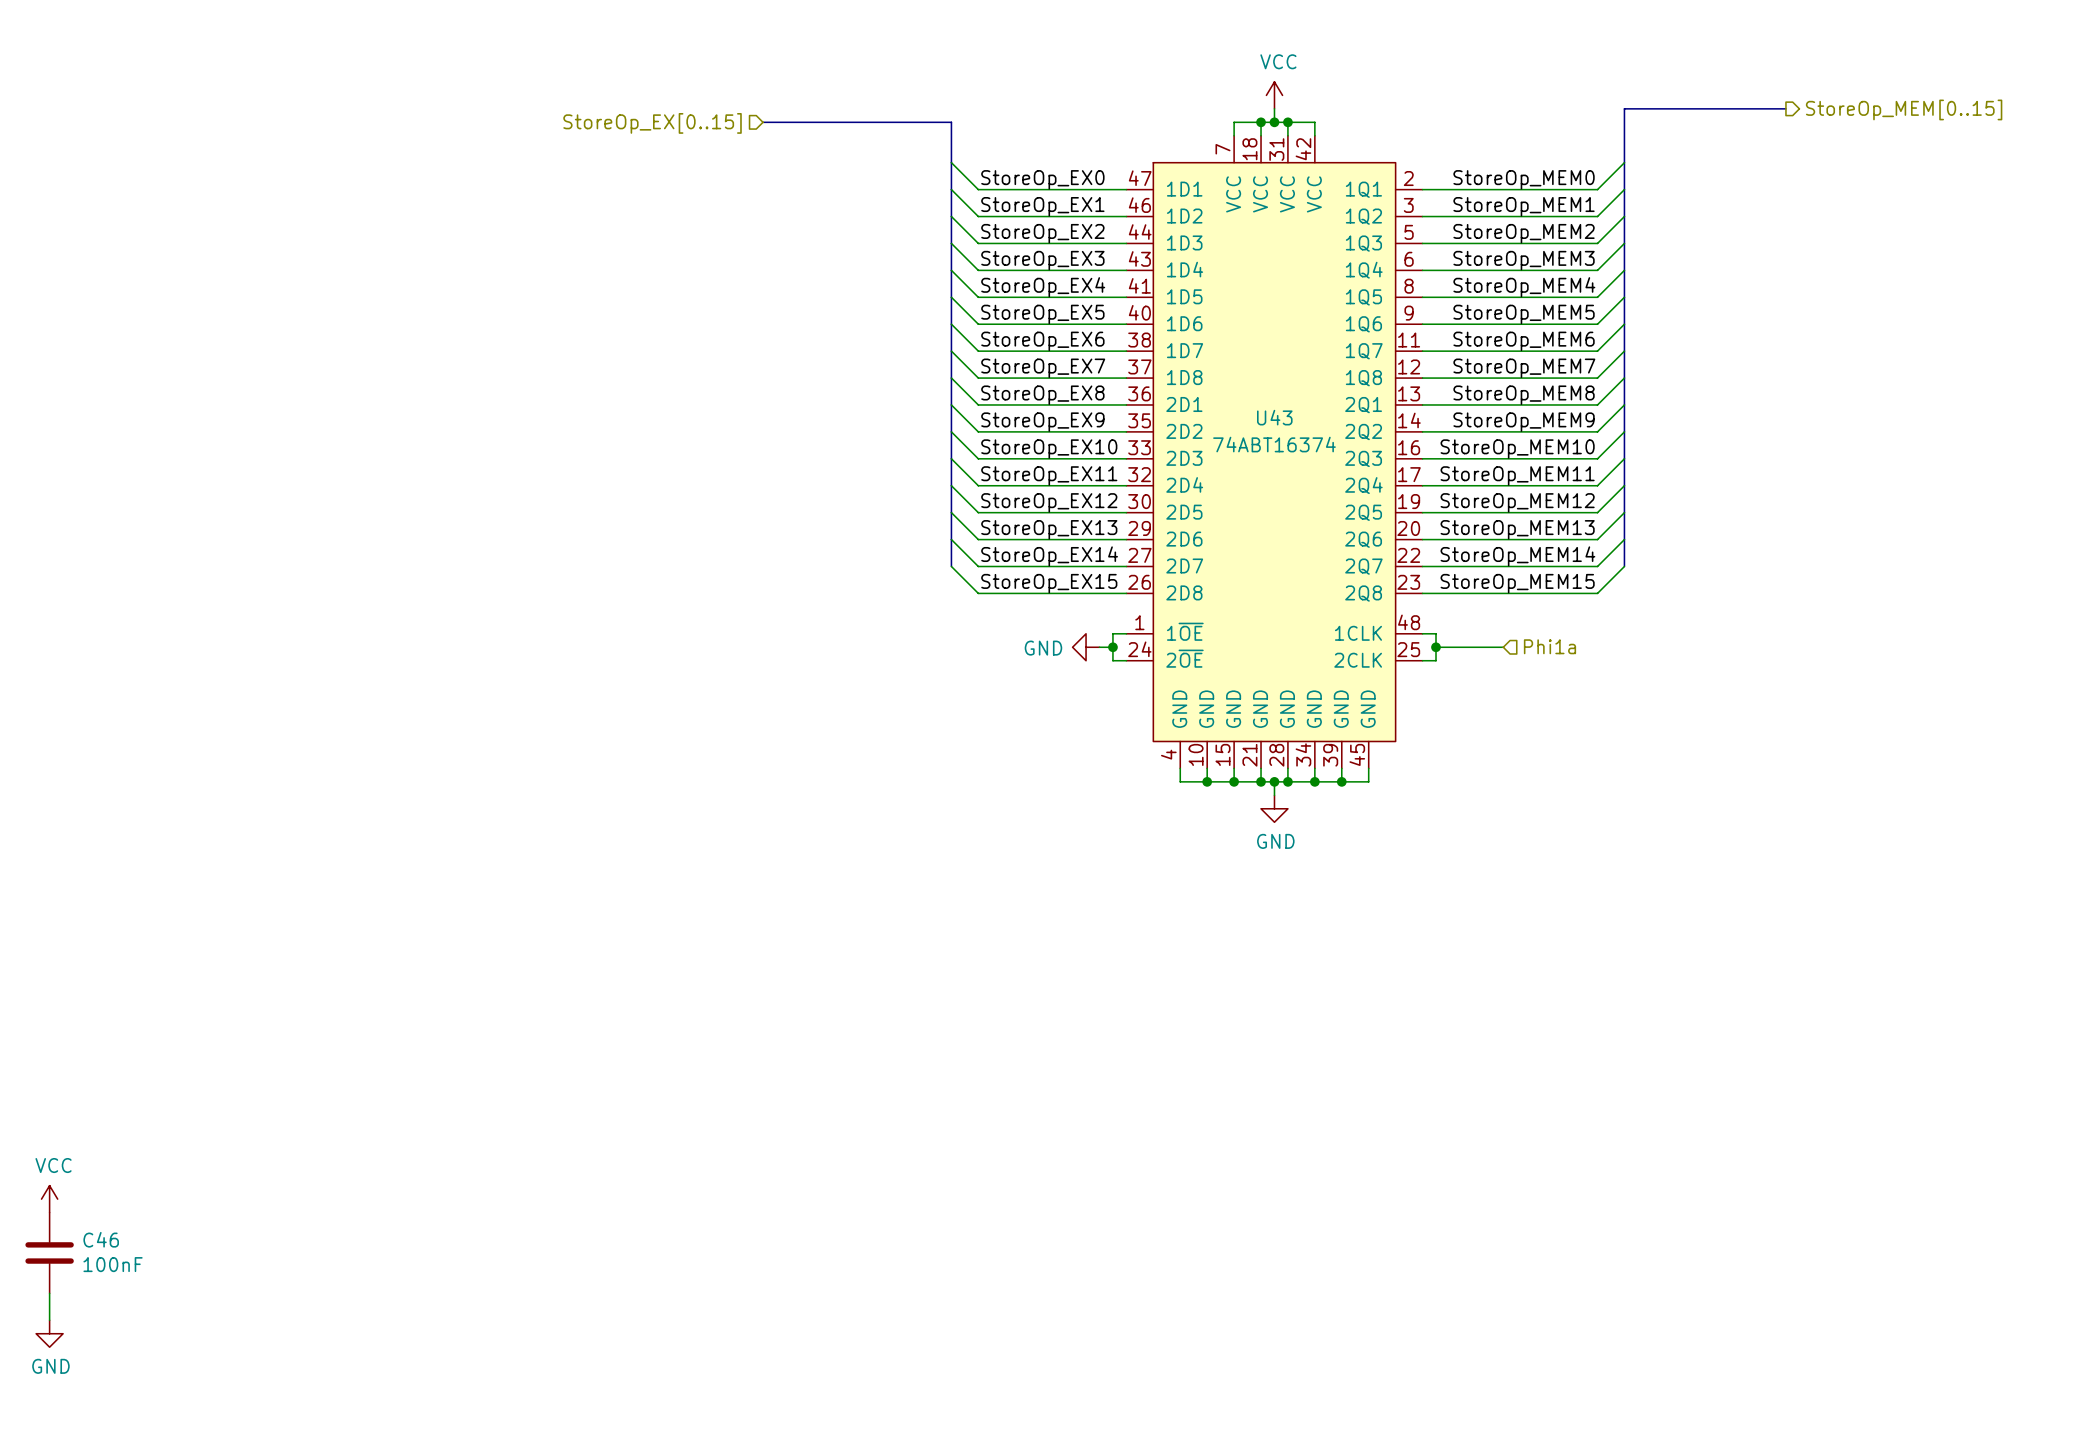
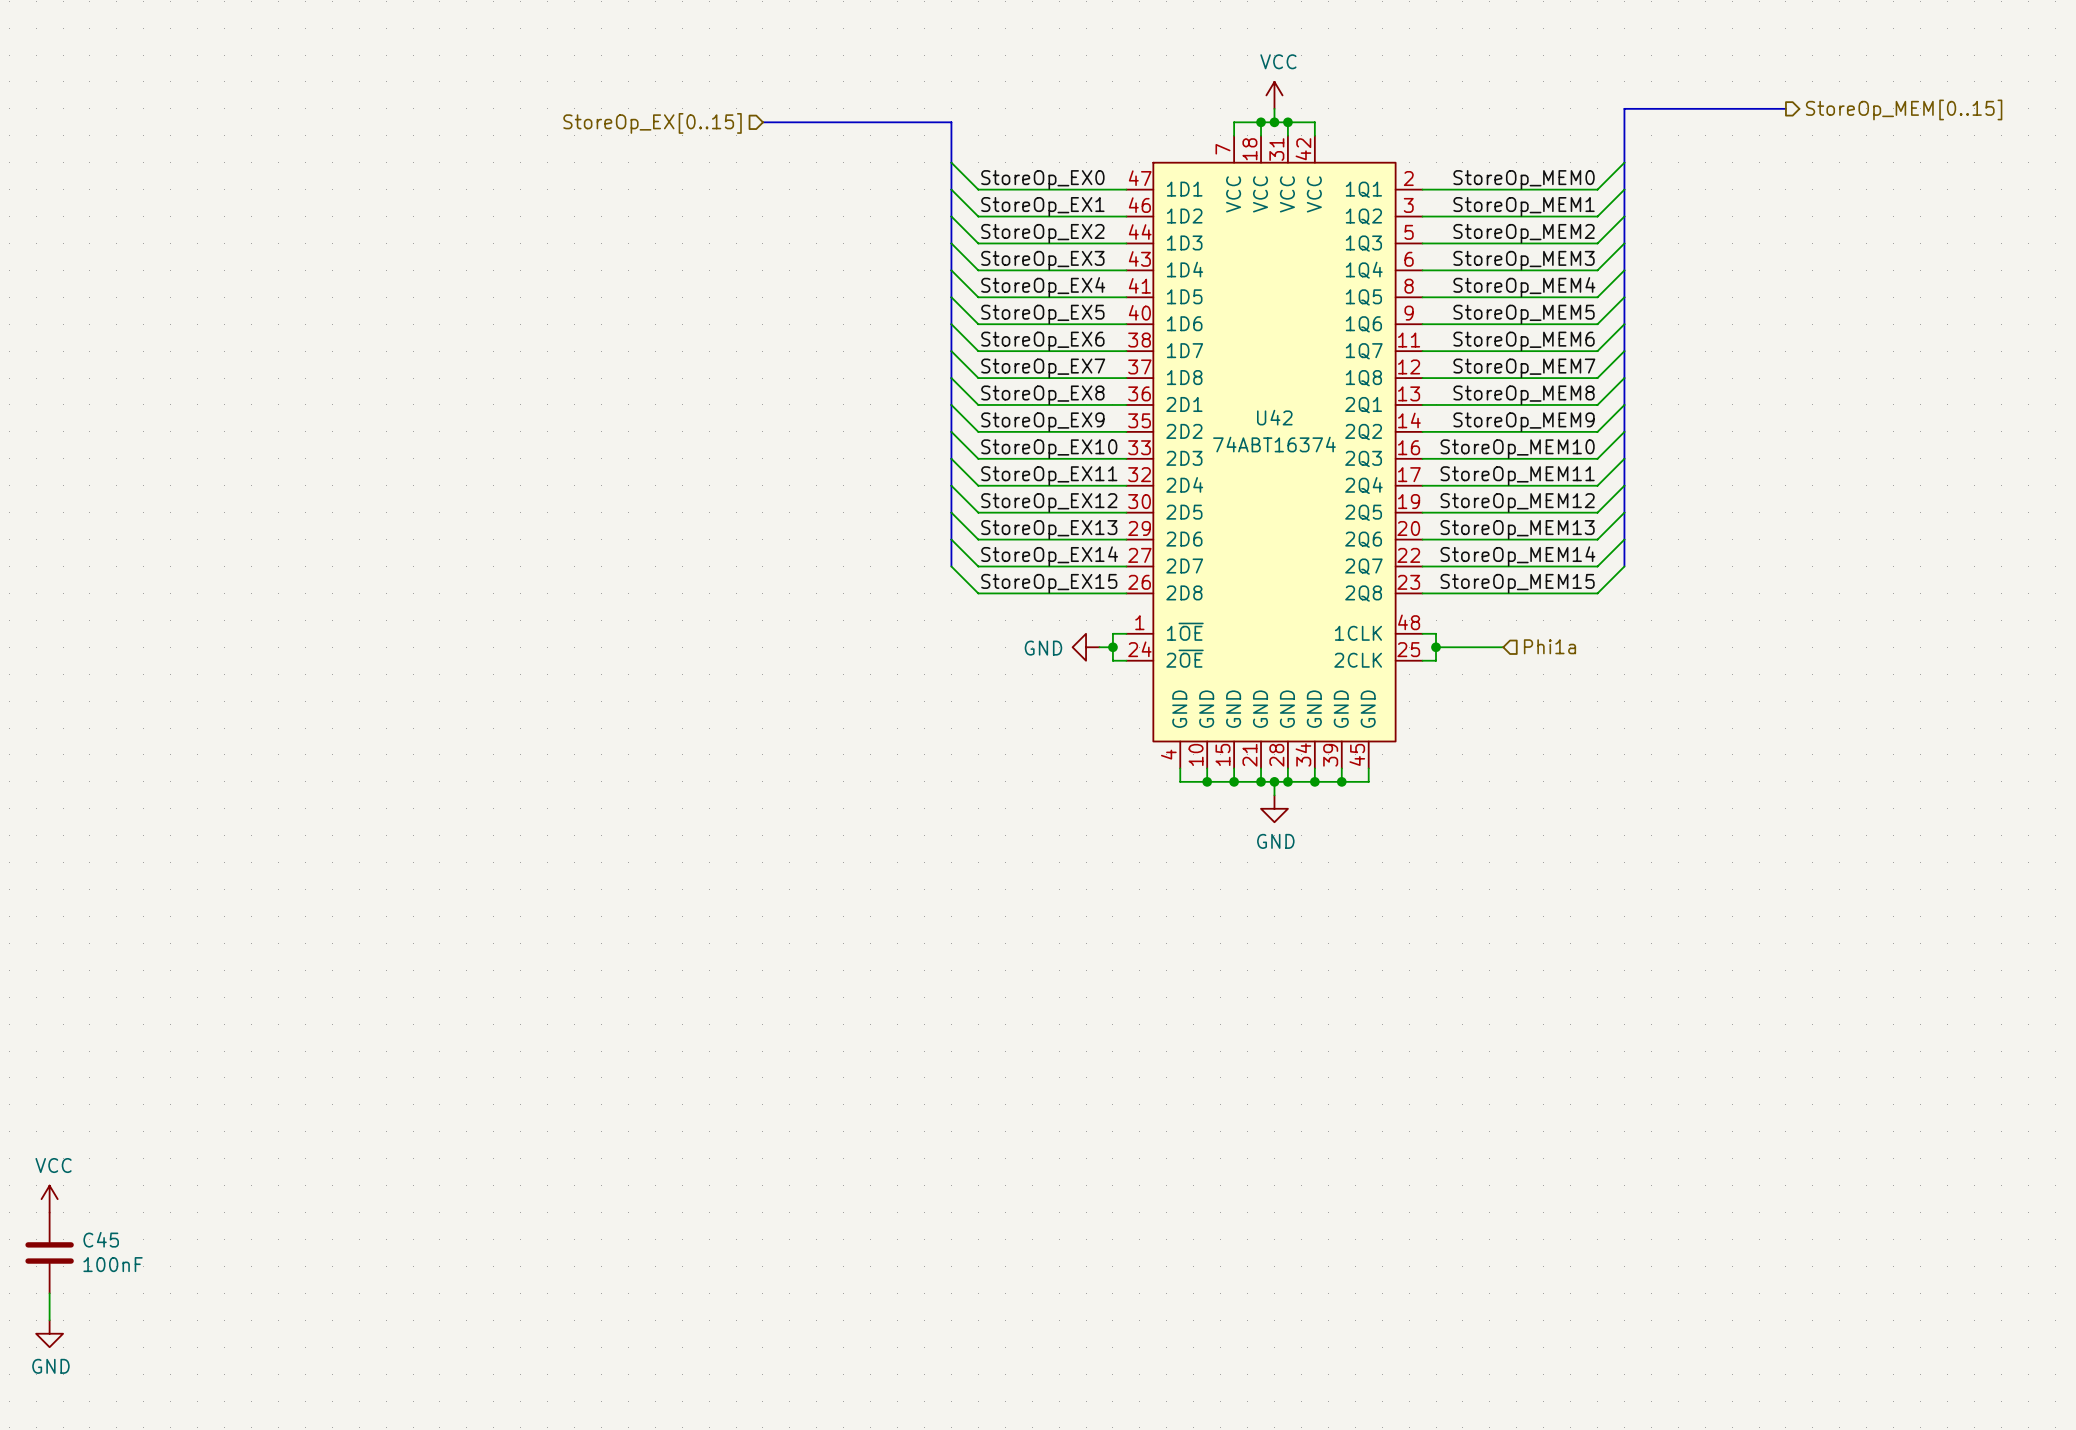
U43 name: U43 (1274, 417) -> U42 (1274, 417)
C46 name: C46 (101, 1239) -> C45 (101, 1239)

